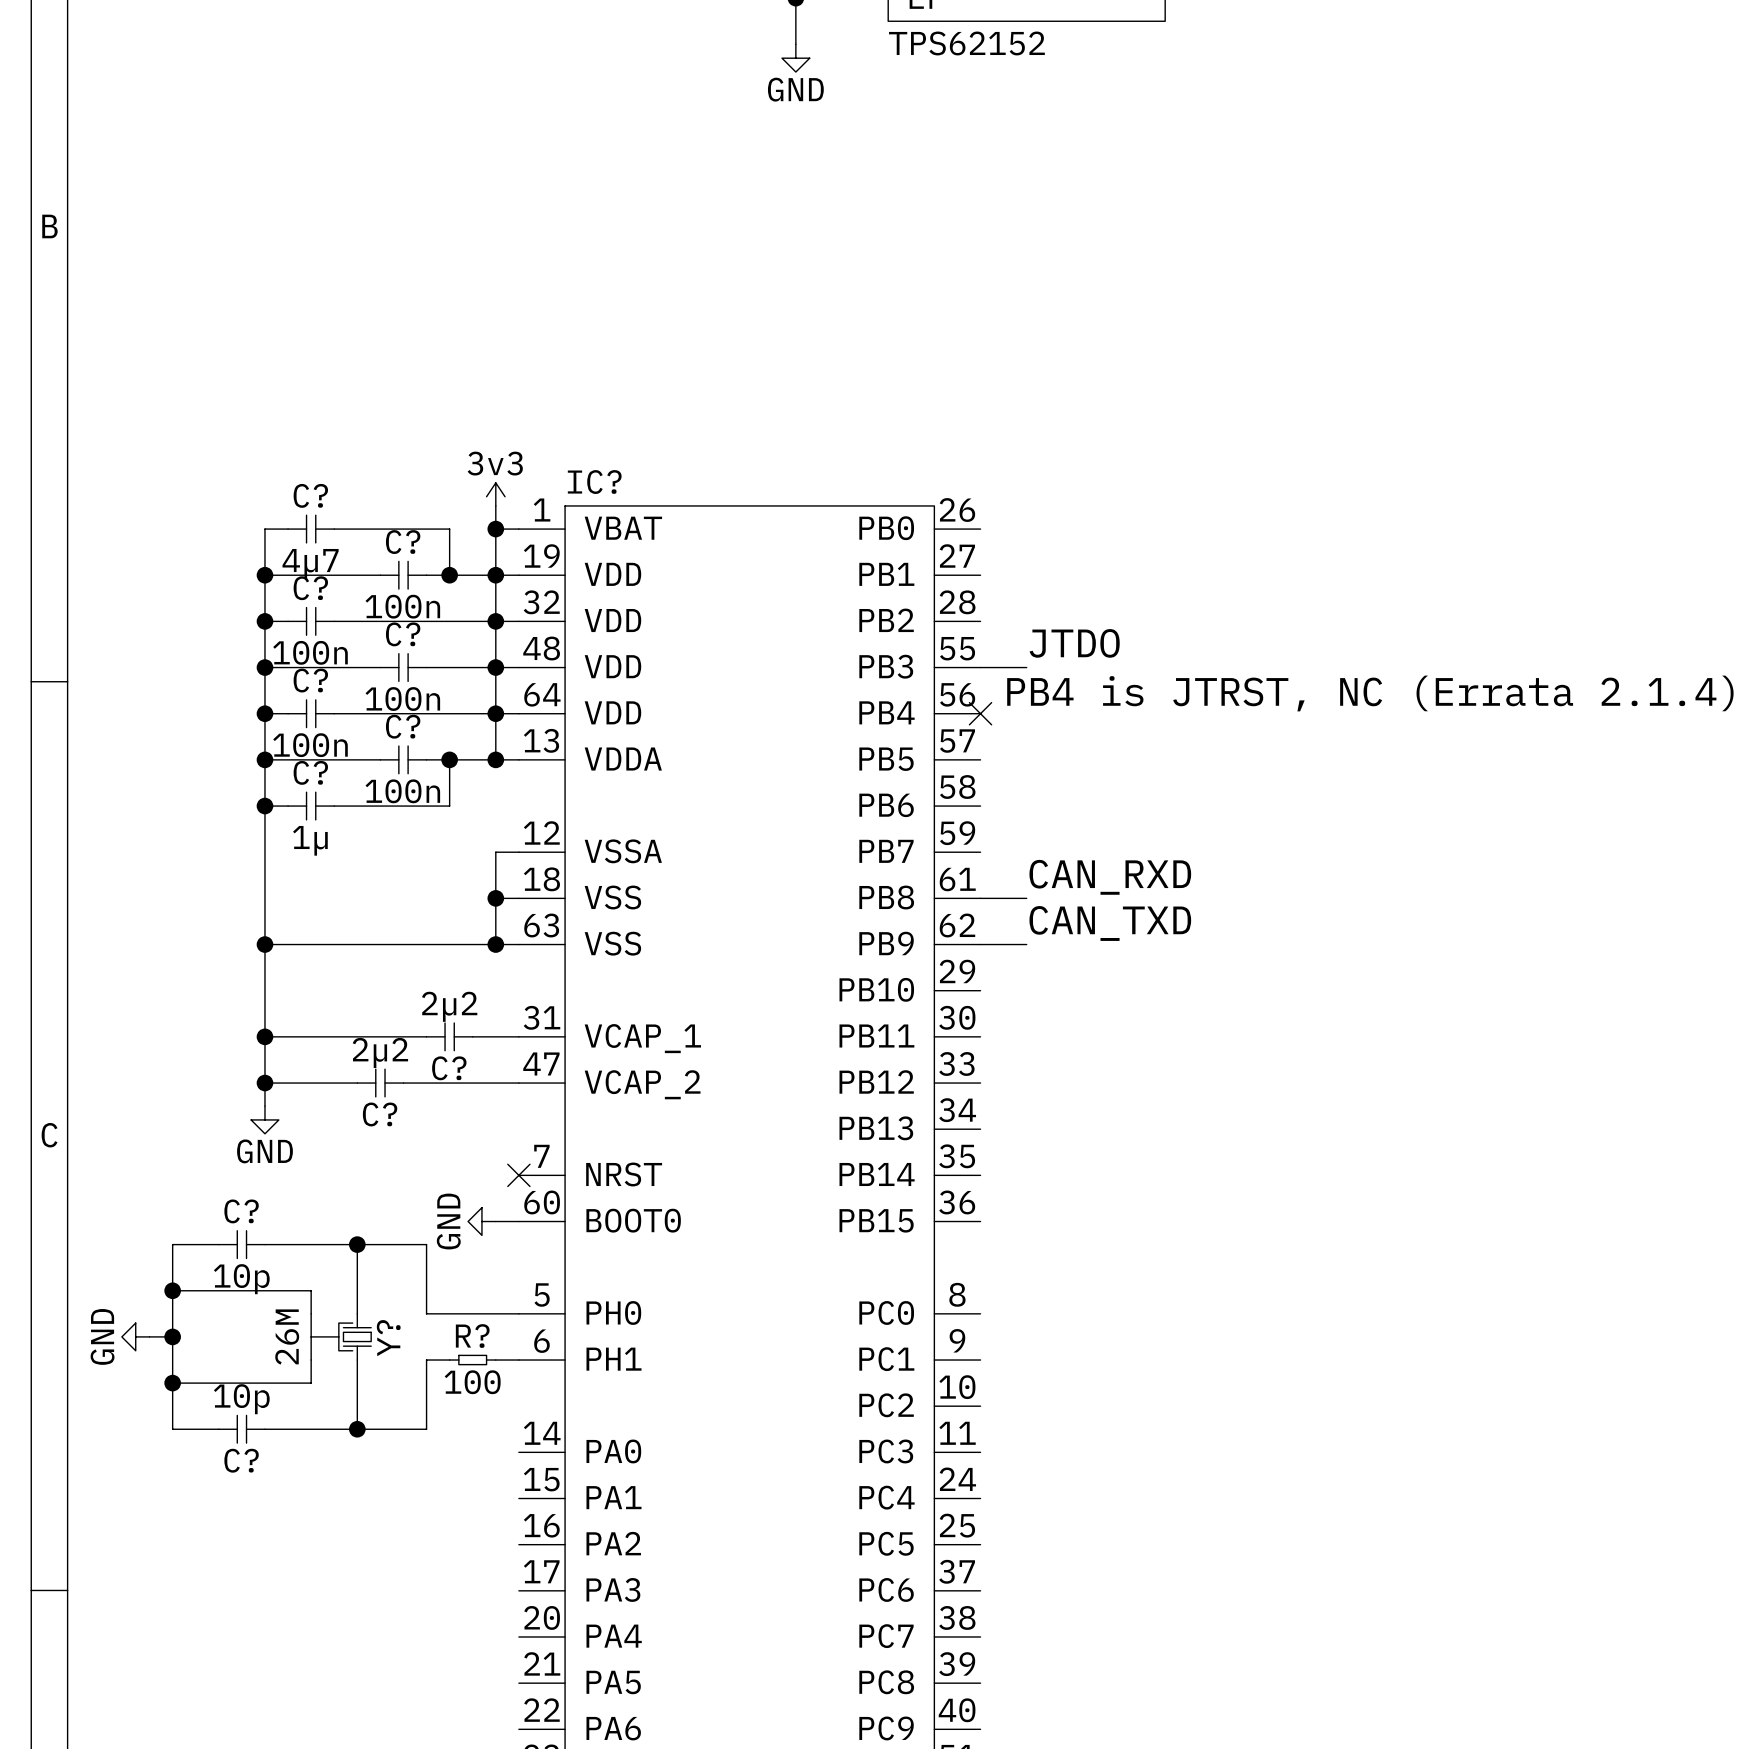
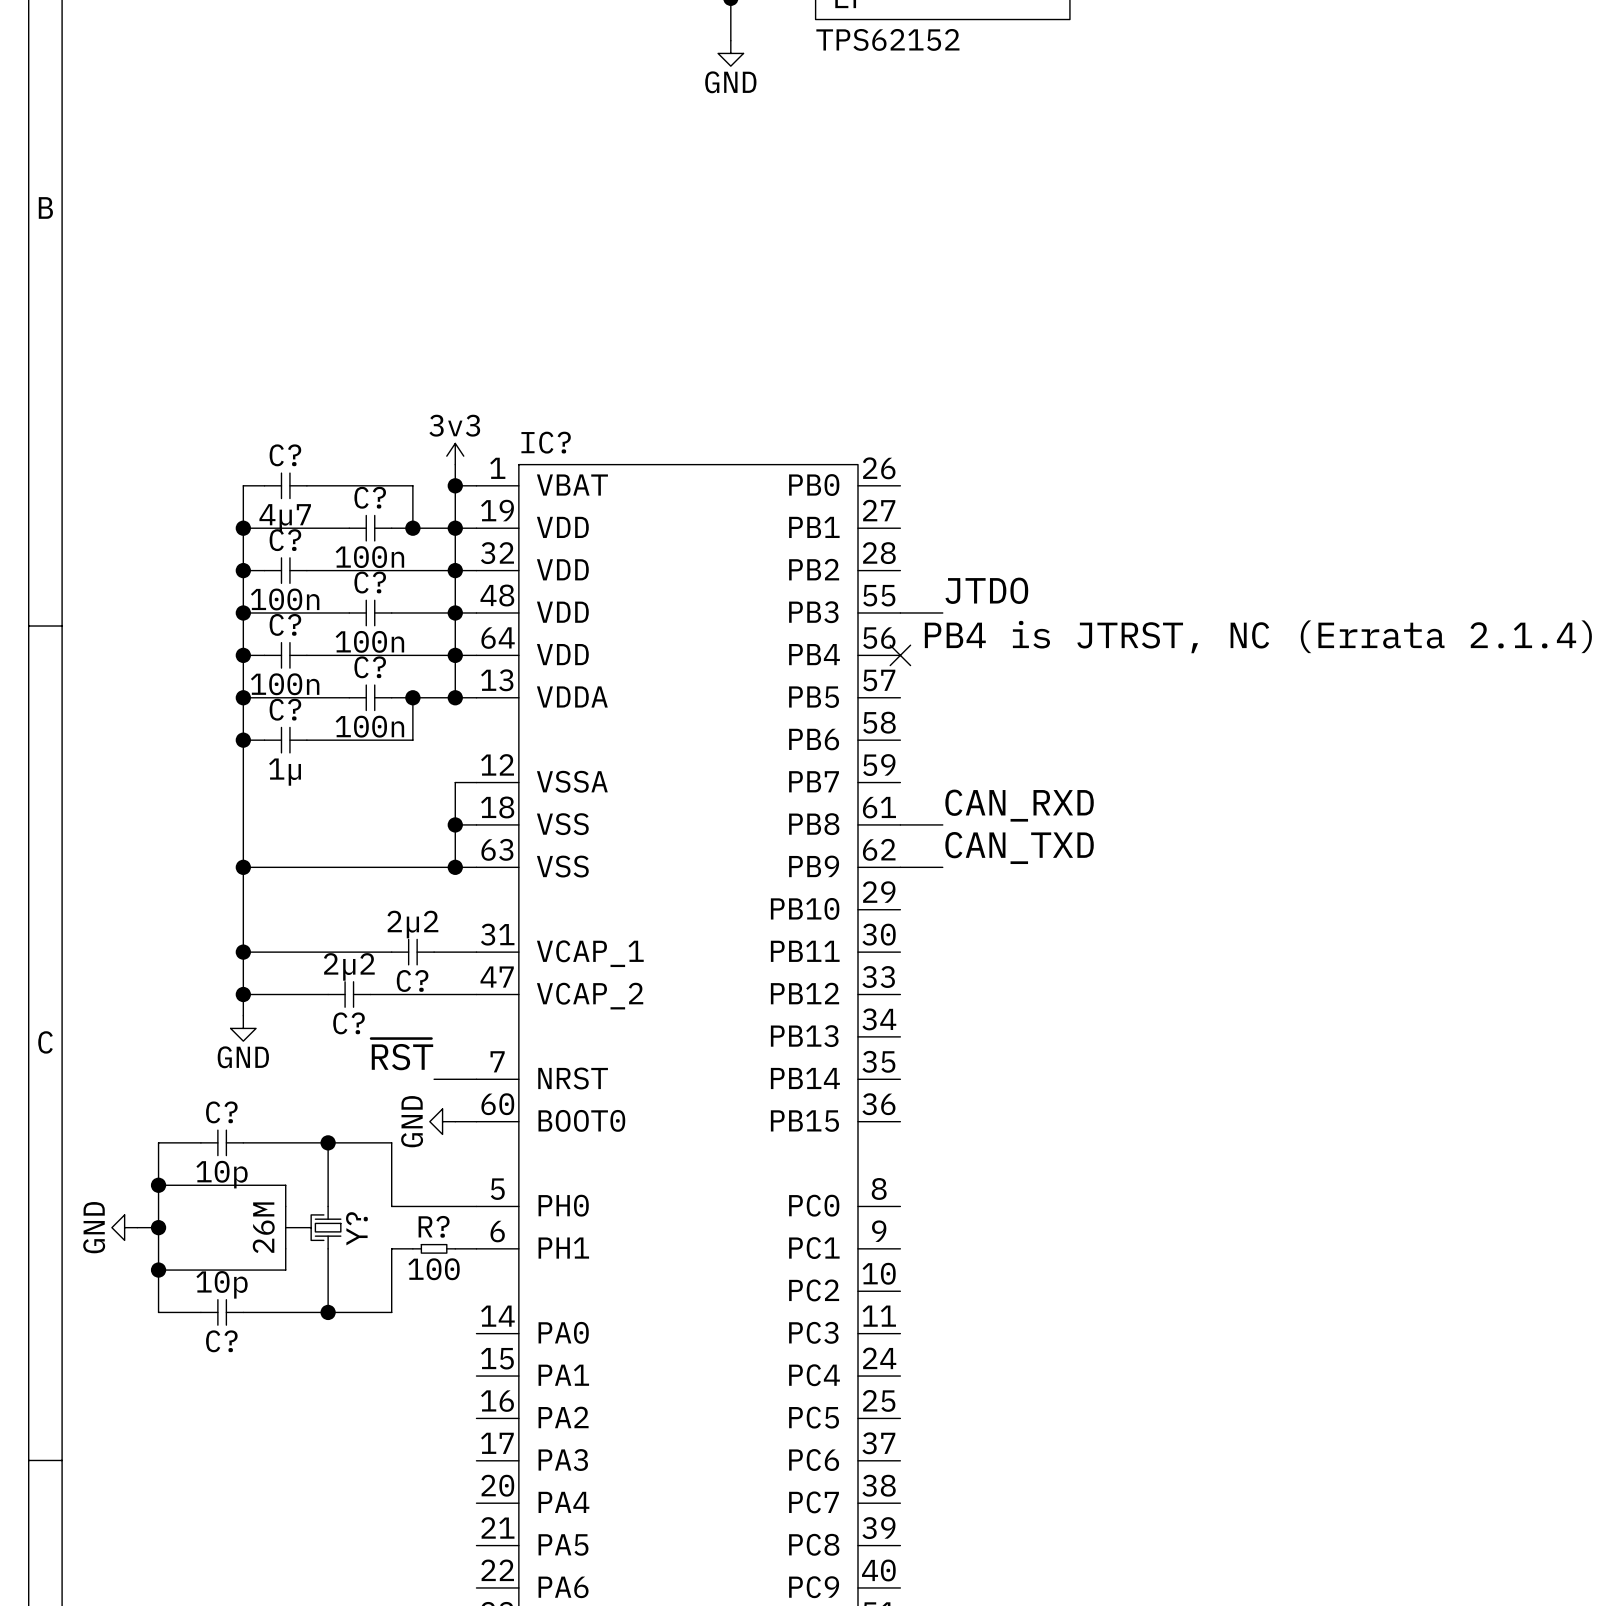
label: none -> ~{RST} (402, 1054)
wire: none -> (434, 1079) (476, 1079)
no-connect mark: (518, 1175) -> none

